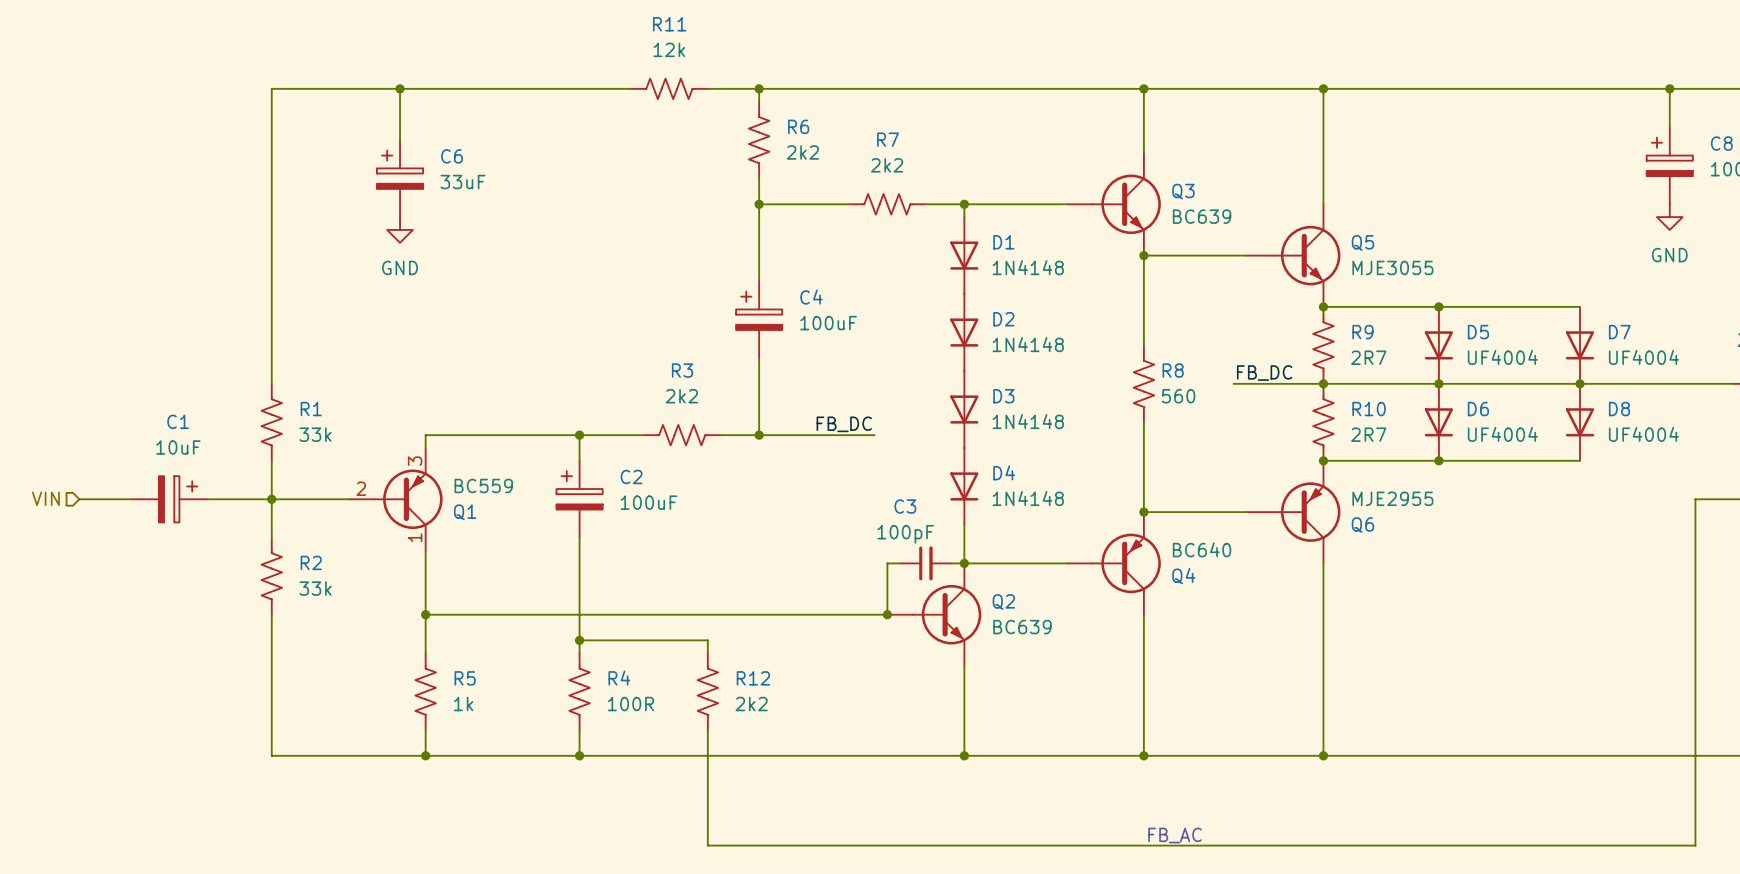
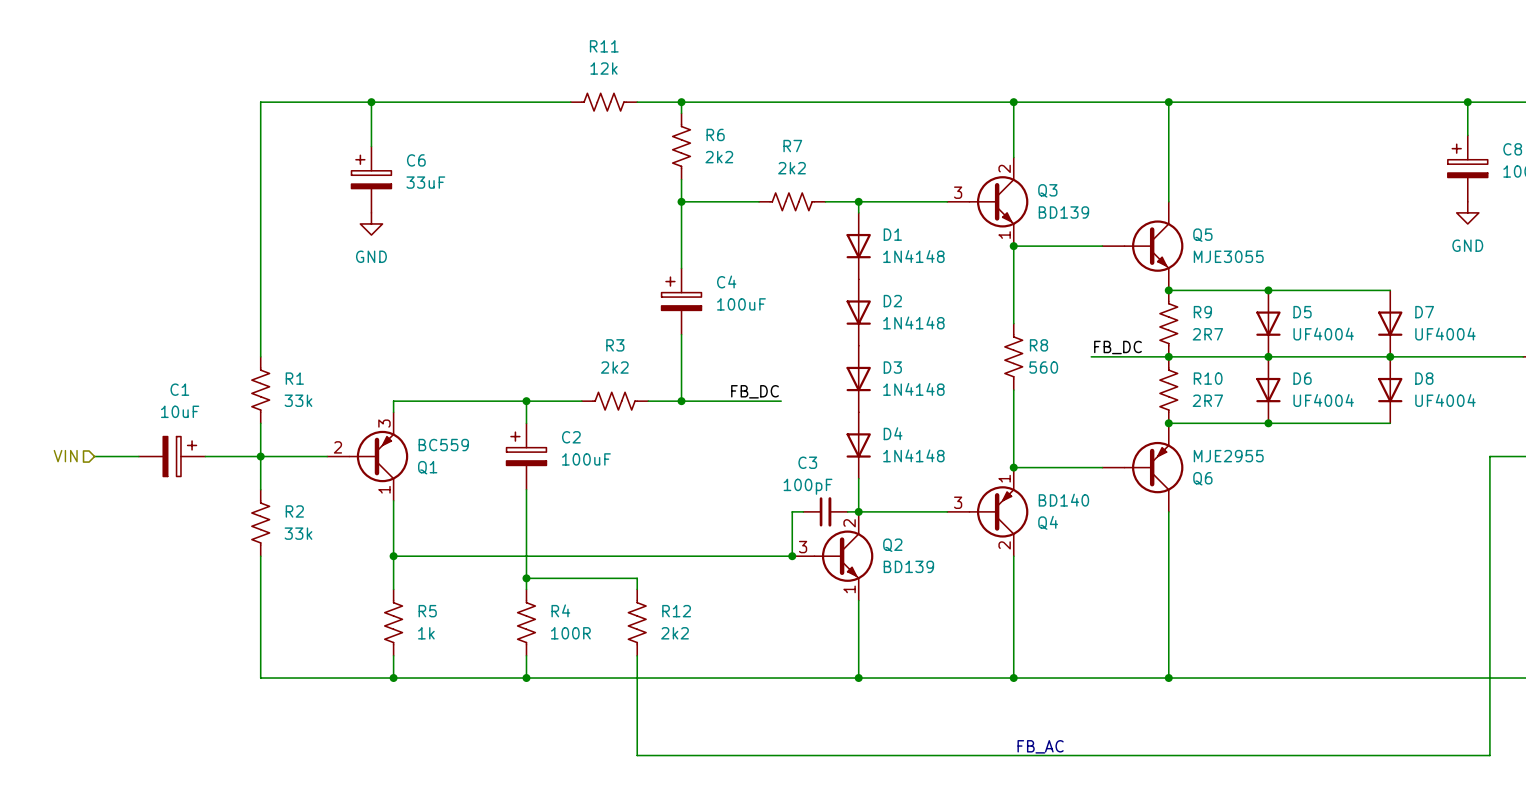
Q3 pin number: none -> 2 (1004, 168)
Q3 pin number: none -> 3 (958, 192)
Q3 value: BC639 (1202, 216) -> BD139 (1063, 212)
Q3 pin number: none -> 1 (1004, 235)
Q4 pin number: none -> 1 (1004, 478)
Q4 value: BC640 (1202, 549) -> BD140 (1063, 500)
Q4 pin number: none -> 3 (958, 502)
Q2 pin number: none -> 2 (849, 523)
Q4 pin number: none -> 2 (1004, 545)
Q2 pin number: none -> 3 (803, 547)
Q2 value: BC639 (1022, 627) -> BD139 (908, 566)
Q2 pin number: none -> 1 (849, 589)

